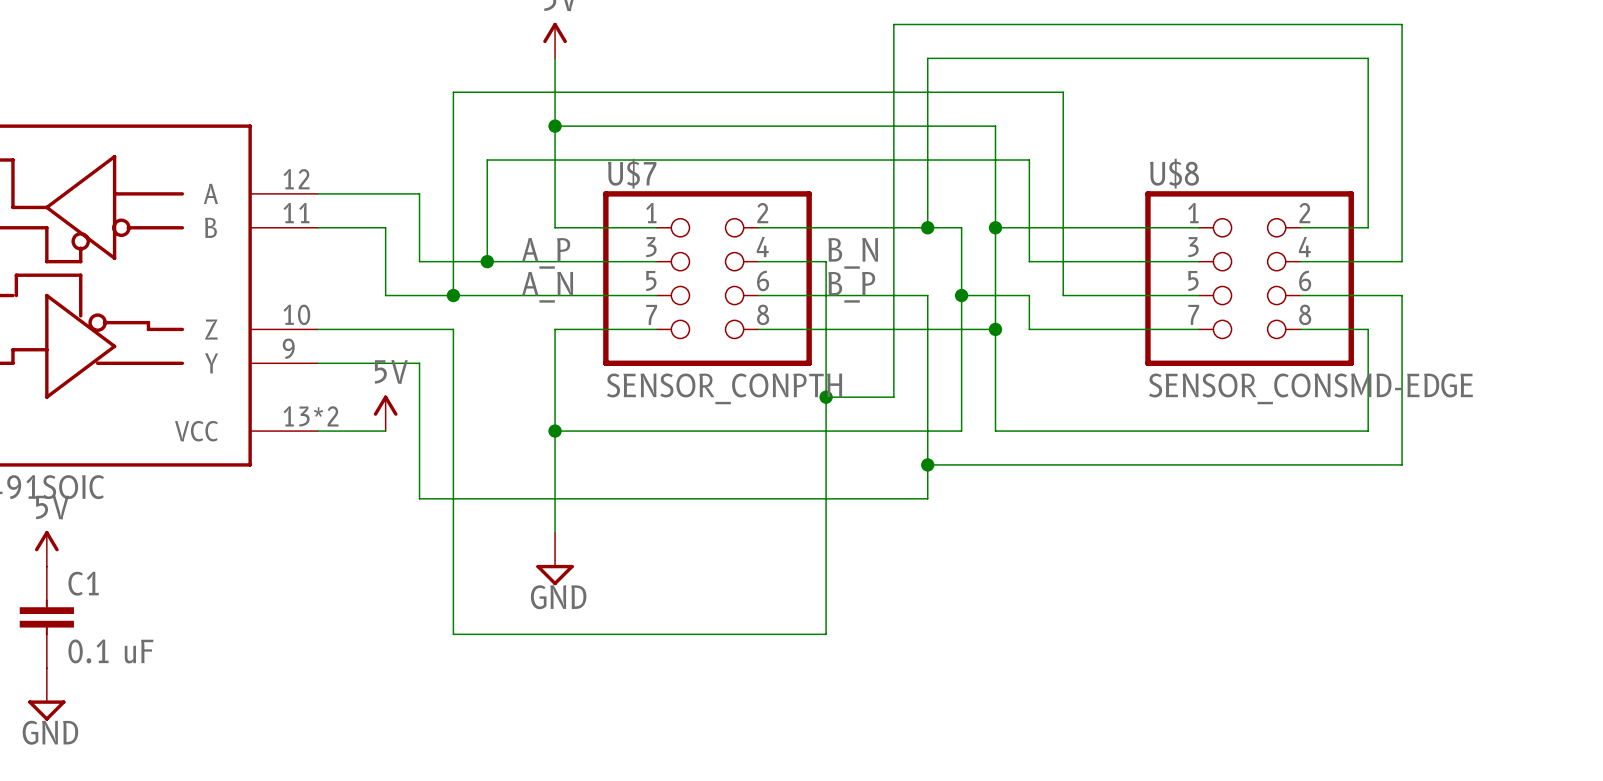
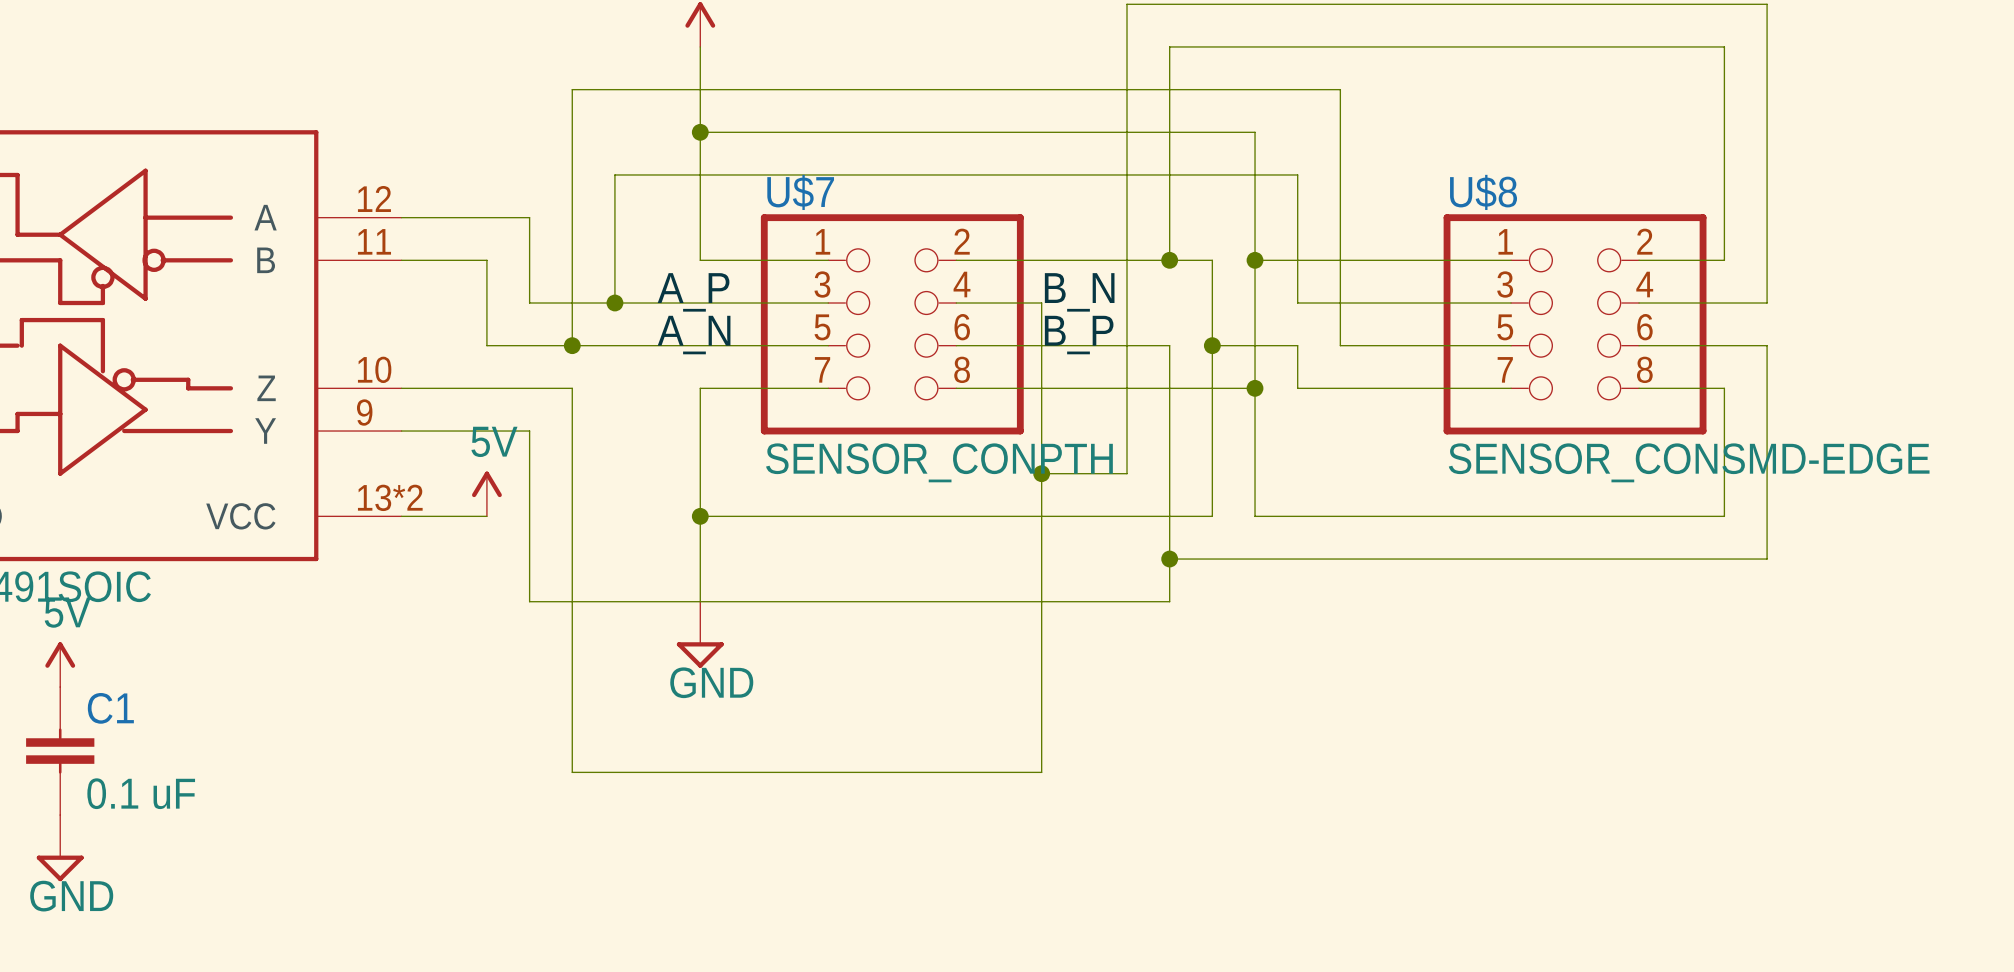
power symbol position: GND (555, 558) -> GND (700, 634)

